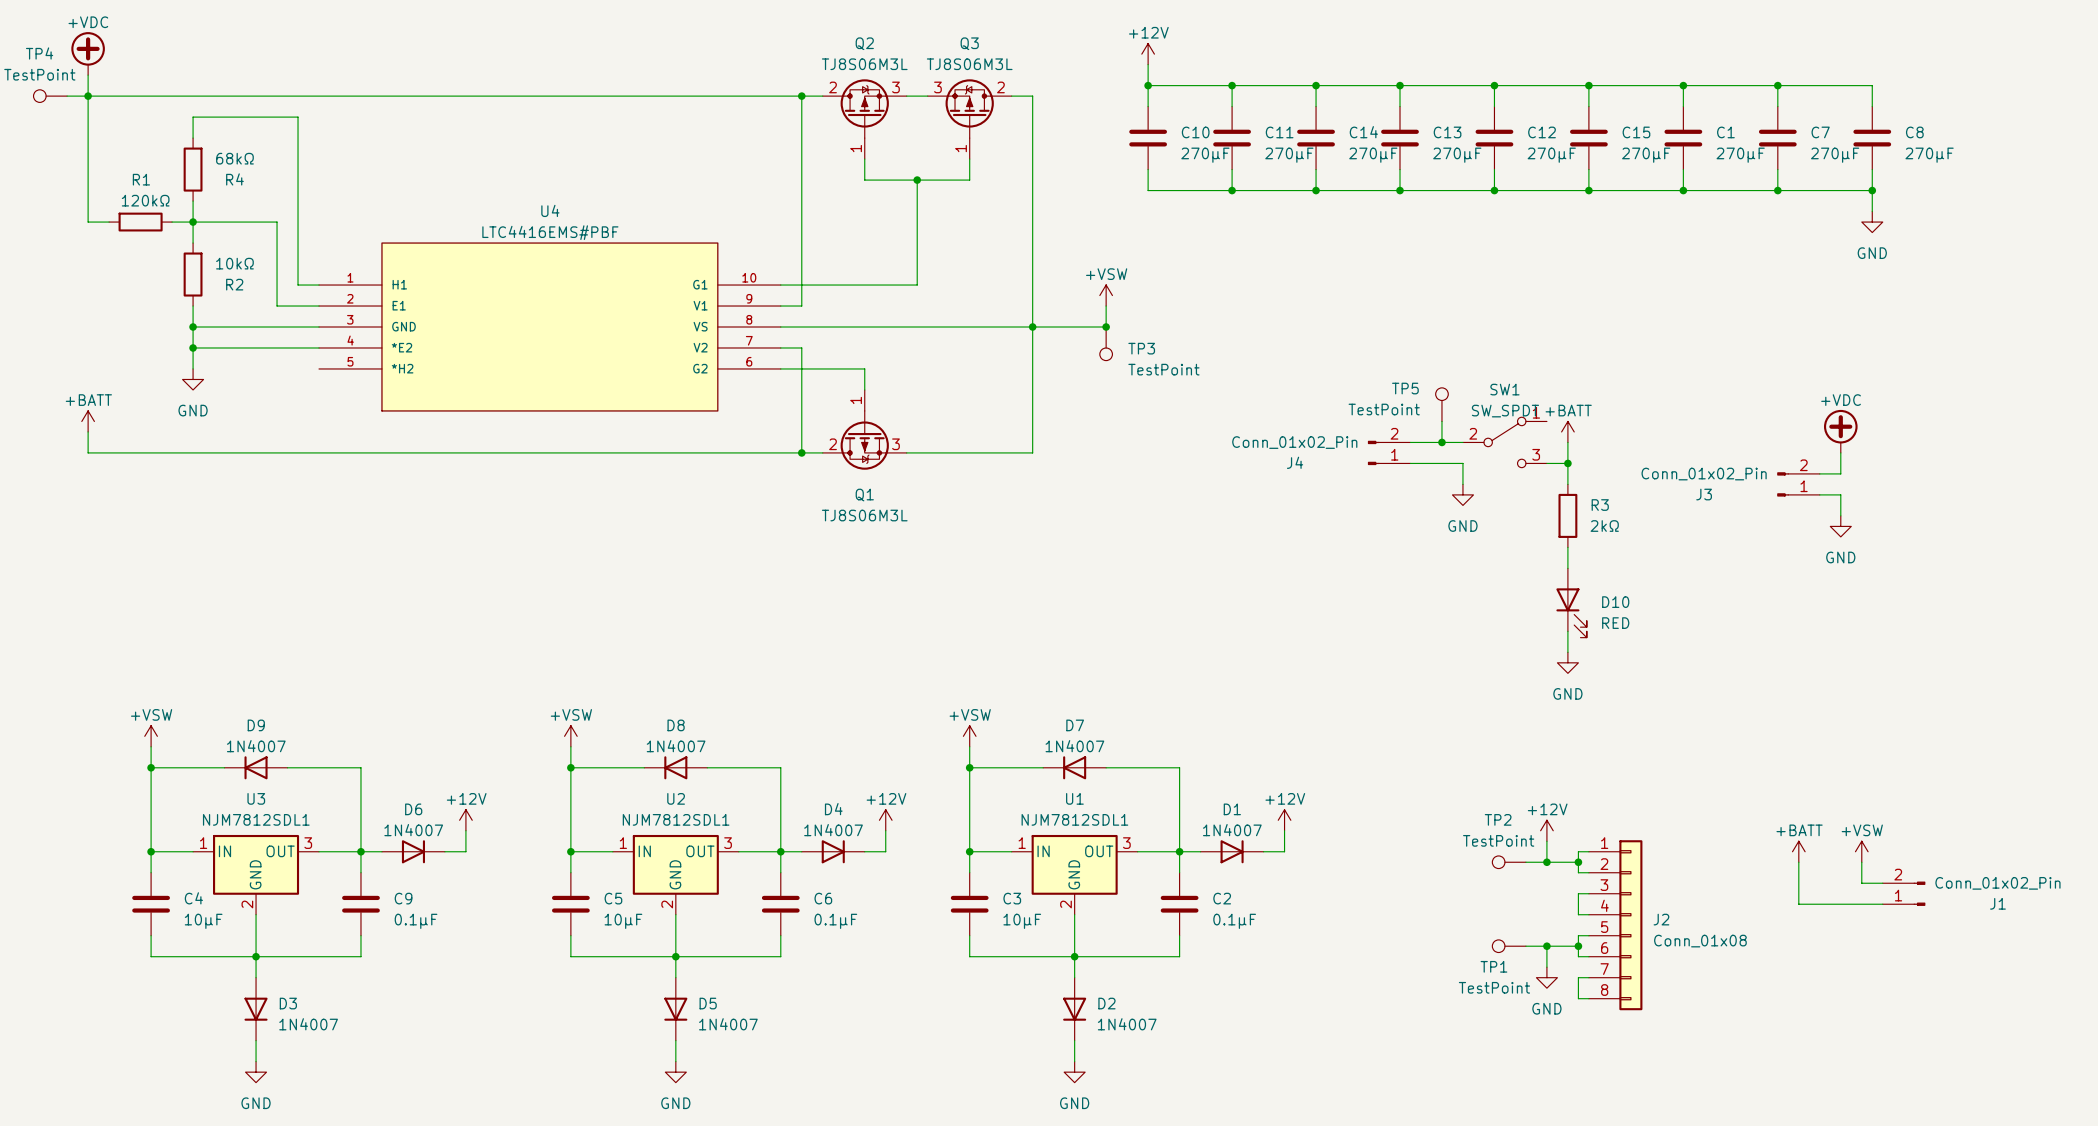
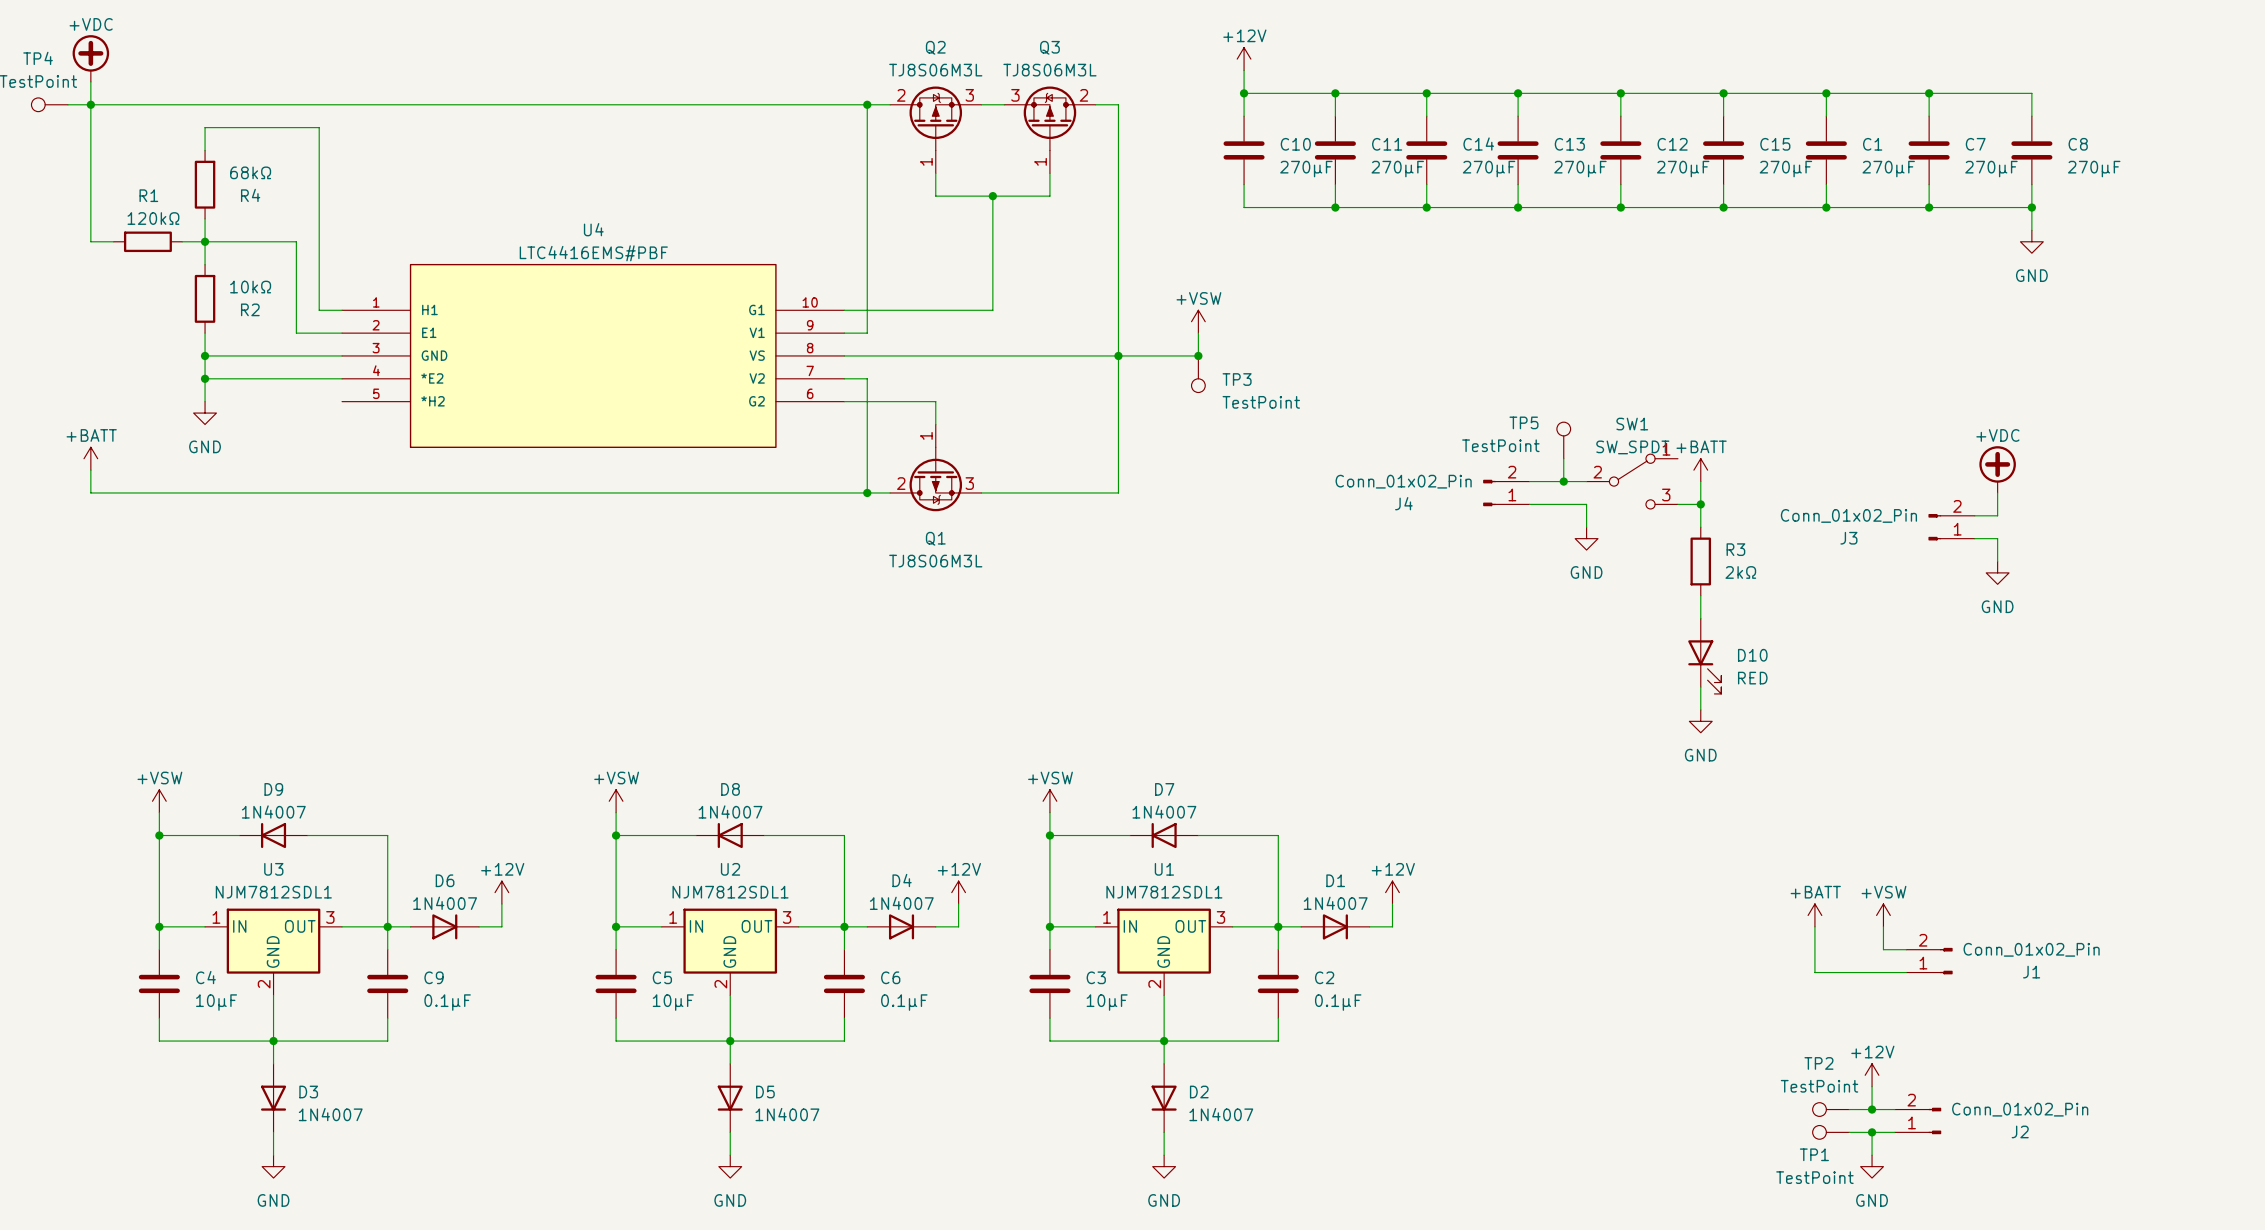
power symbol: +12V (1546, 830) -> none
J2 symbol: [1588, 840, 1643, 1011] -> [1894, 1107, 1942, 1135]
wire: (1546, 841) (1546, 862) -> none
wire: (1588, 851) (1578, 851) (1578, 872) (1588, 872) -> none
power symbol position: +BATT (1798, 851) -> +BATT (1814, 915)
power symbol position: +VSW (1861, 851) -> +VSW (1883, 915)
TP2 position: (1509, 862) -> (1830, 1109)
wire: (1525, 862) (1578, 862) -> none
junction: (1546, 862) -> none
junction: (1578, 862) -> none
wire: (1798, 862) (1798, 904) (1882, 904) -> (1814, 926) (1814, 972) (1906, 972)
wire: (1861, 862) (1861, 883) (1882, 883) -> (1883, 926) (1883, 949) (1906, 949)
wire: (1588, 893) (1578, 893) (1578, 914) (1588, 914) -> none
J1 position: (1904, 893) -> (1929, 961)
J2 name position: J2 (1661, 919) -> J2 (2020, 1131)
wire: (1588, 935) (1578, 935) (1578, 956) (1588, 956) -> none
J2 value: Conn_01x08 (1700, 941) -> Conn_01x02_Pin (2020, 1109)
TP1 position: (1509, 946) -> (1830, 1132)
wire: (1525, 946) (1578, 946) -> none
wire: (1546, 946) (1546, 967) -> (1872, 1086) (1872, 1109)
junction: (1546, 946) -> none
junction: (1578, 946) -> none
power symbol position: GND (1546, 977) -> GND (1872, 1166)
wire: (1588, 977) (1578, 977) (1578, 998) (1588, 998) -> none
power symbol: none -> +12V (1872, 1075)
wire: none -> (1849, 1109) (1894, 1109)
junction: none -> (1872, 1109)
wire: none -> (1849, 1132) (1894, 1132)
wire: none -> (1872, 1132) (1872, 1155)
junction: none -> (1872, 1132)

